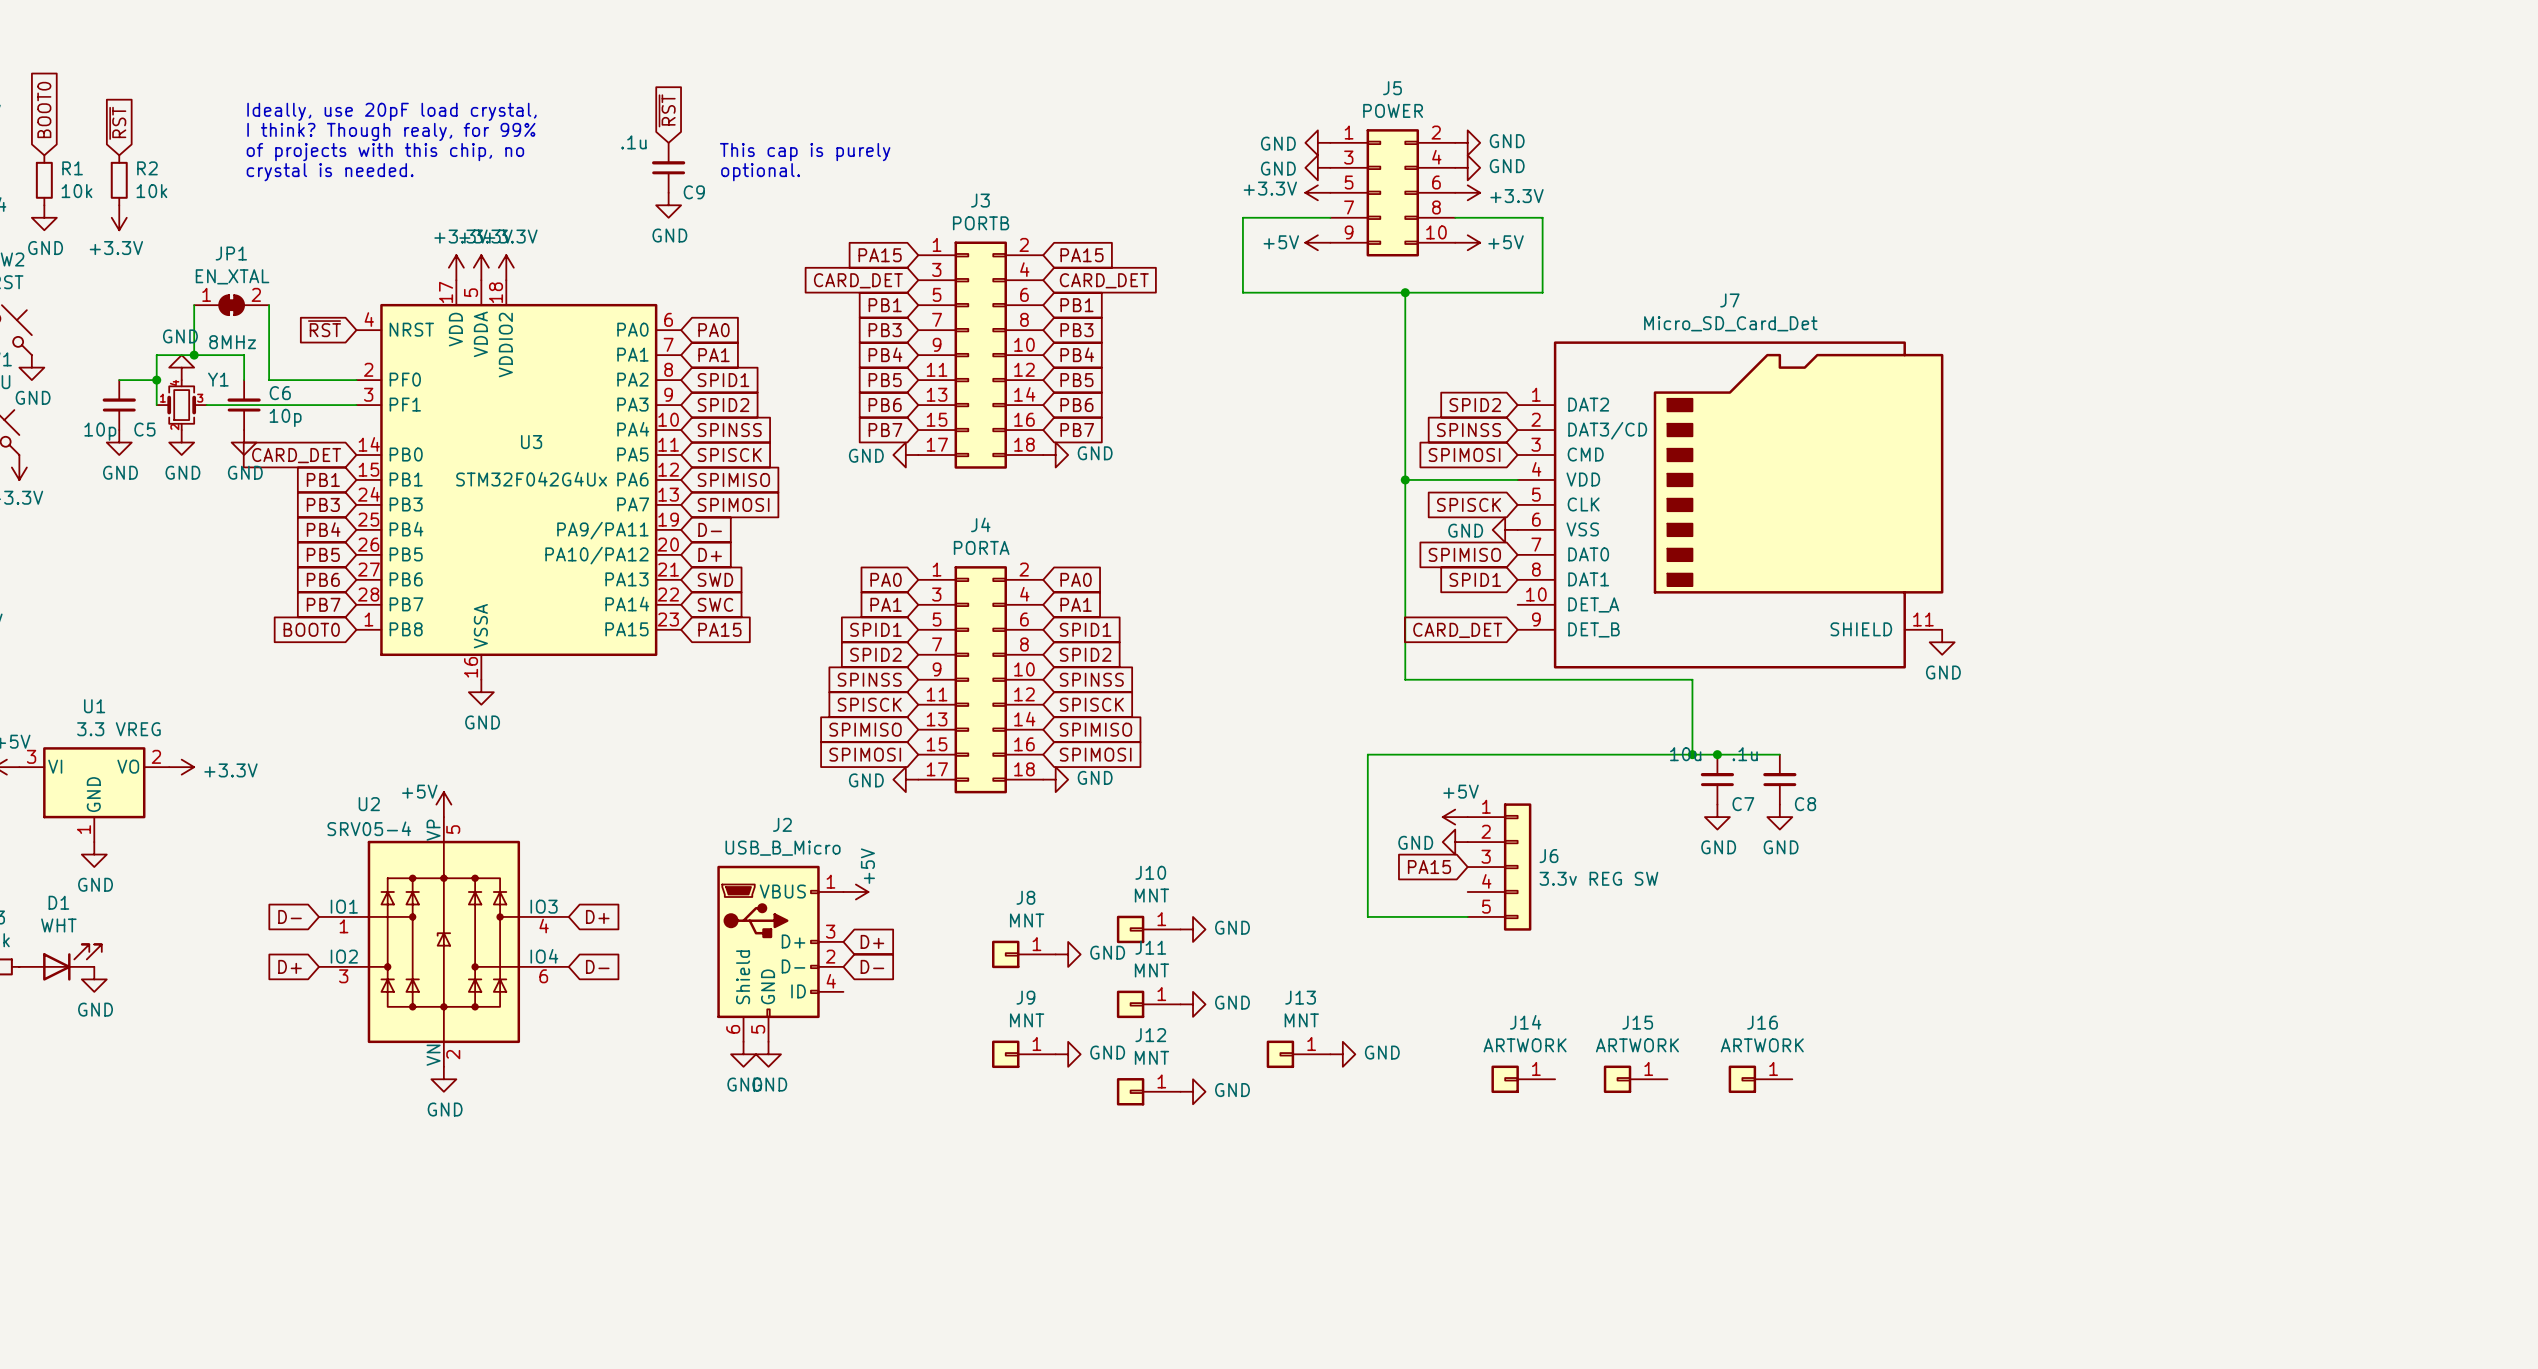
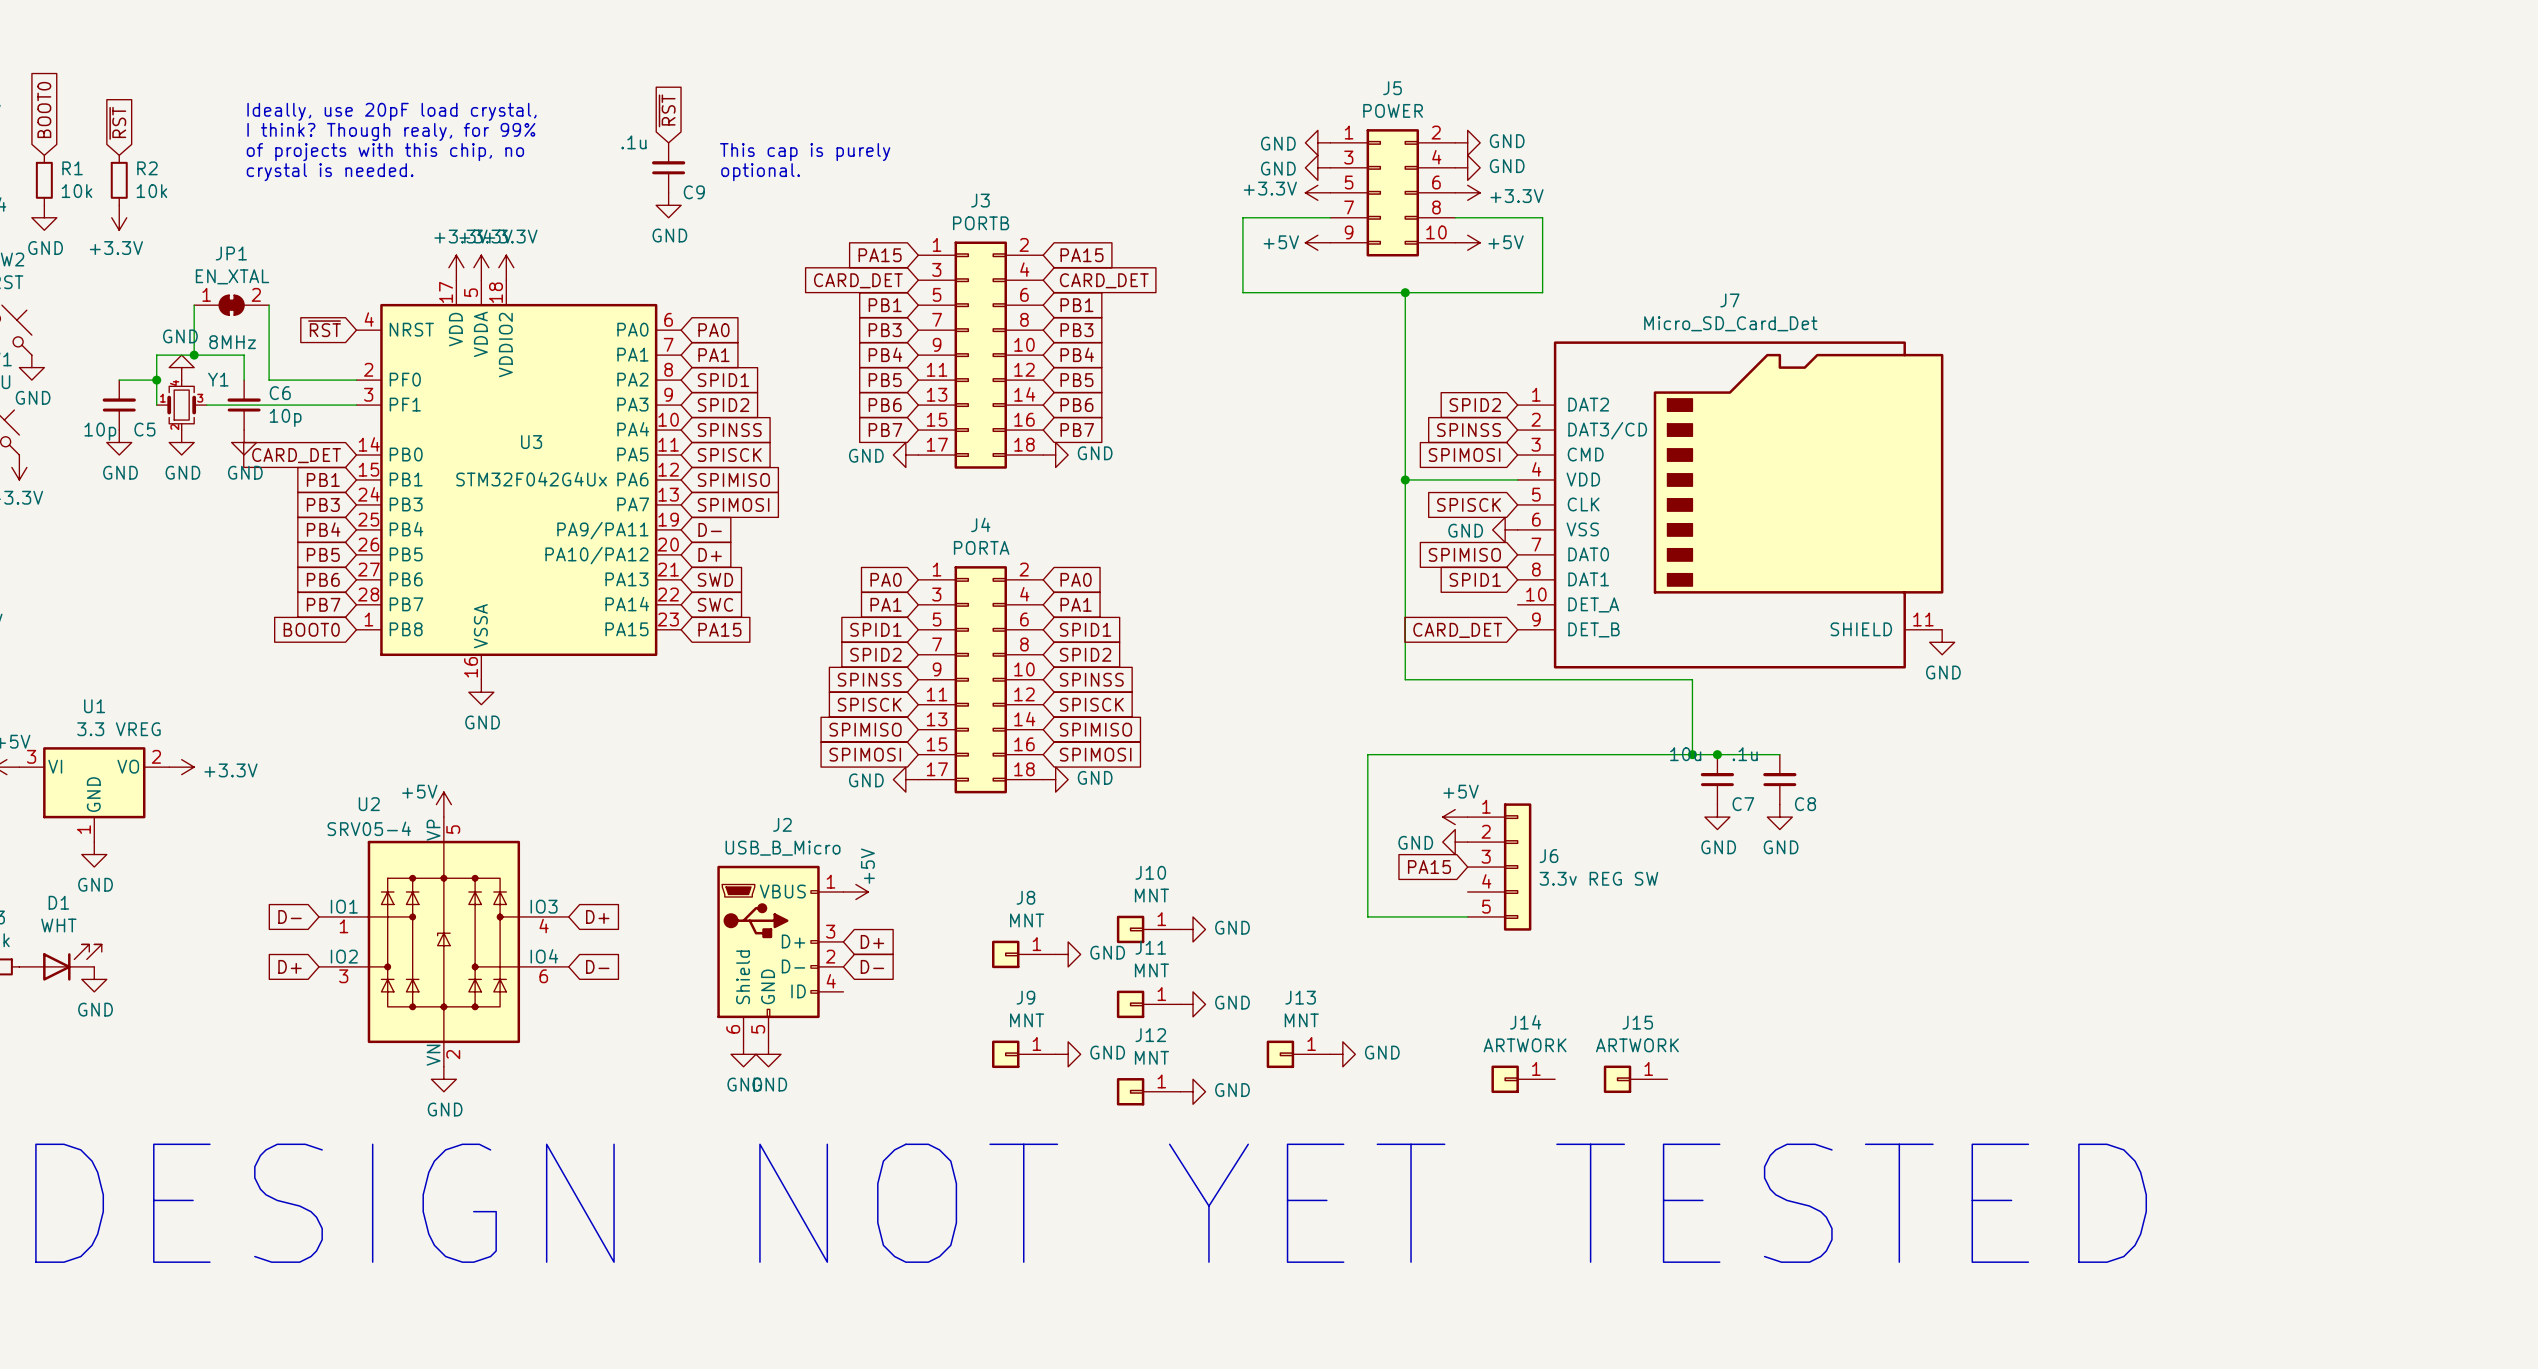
J16: ARTWORK (1760, 1079) -> none
text: none -> DESIGN NOT YET TESTED (1091, 1203)

